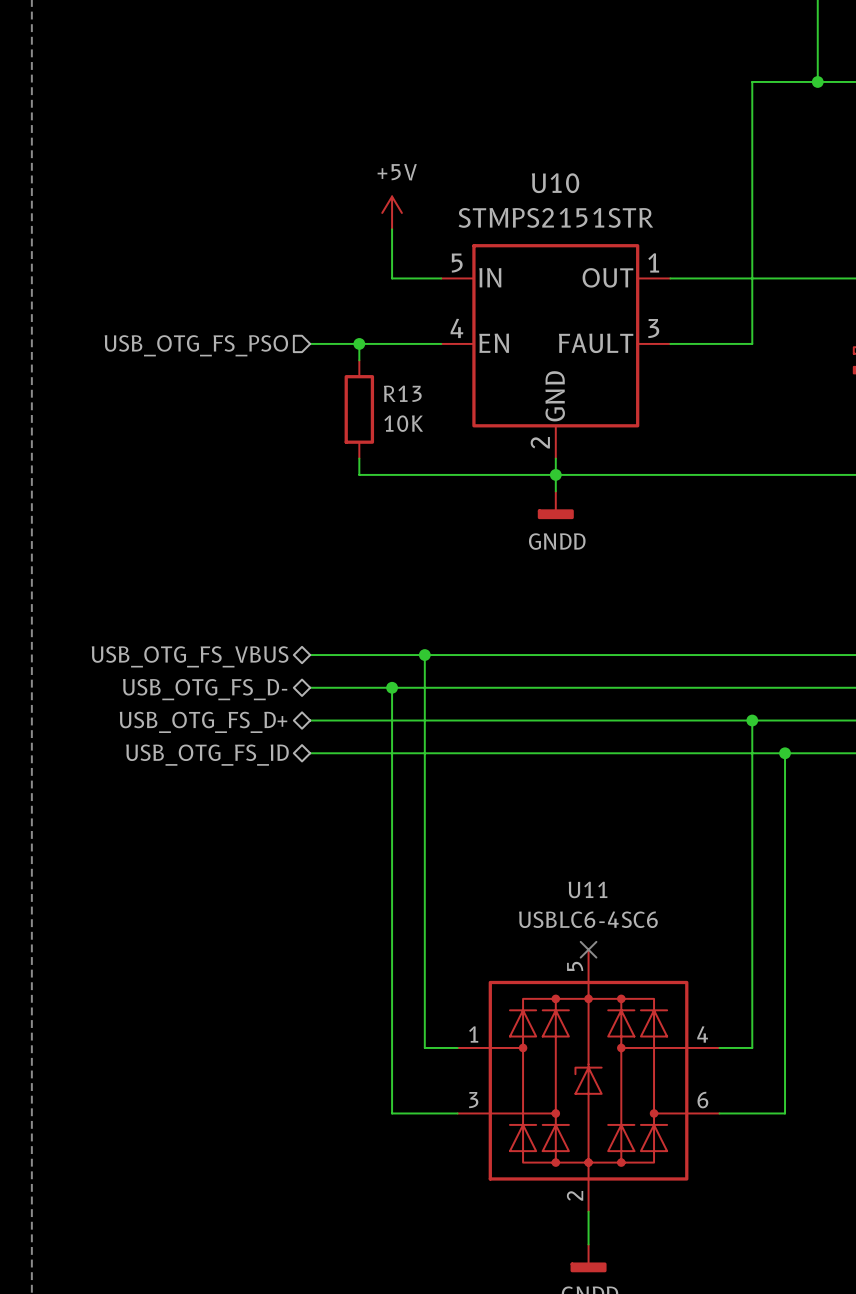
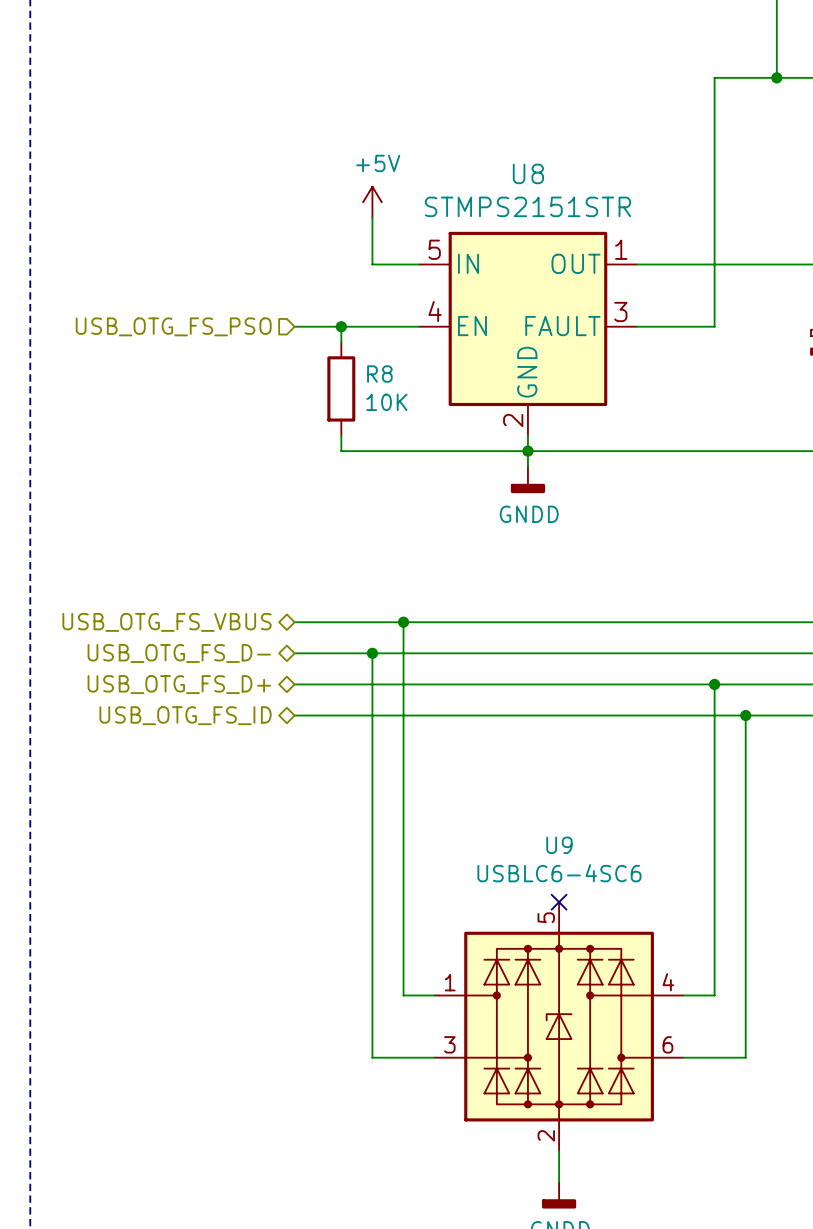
U10 name: U10 (555, 183) -> U8 (528, 173)
R13 name: R13 (402, 393) -> R8 (379, 374)
U11 name: U11 (588, 889) -> U9 (559, 845)

